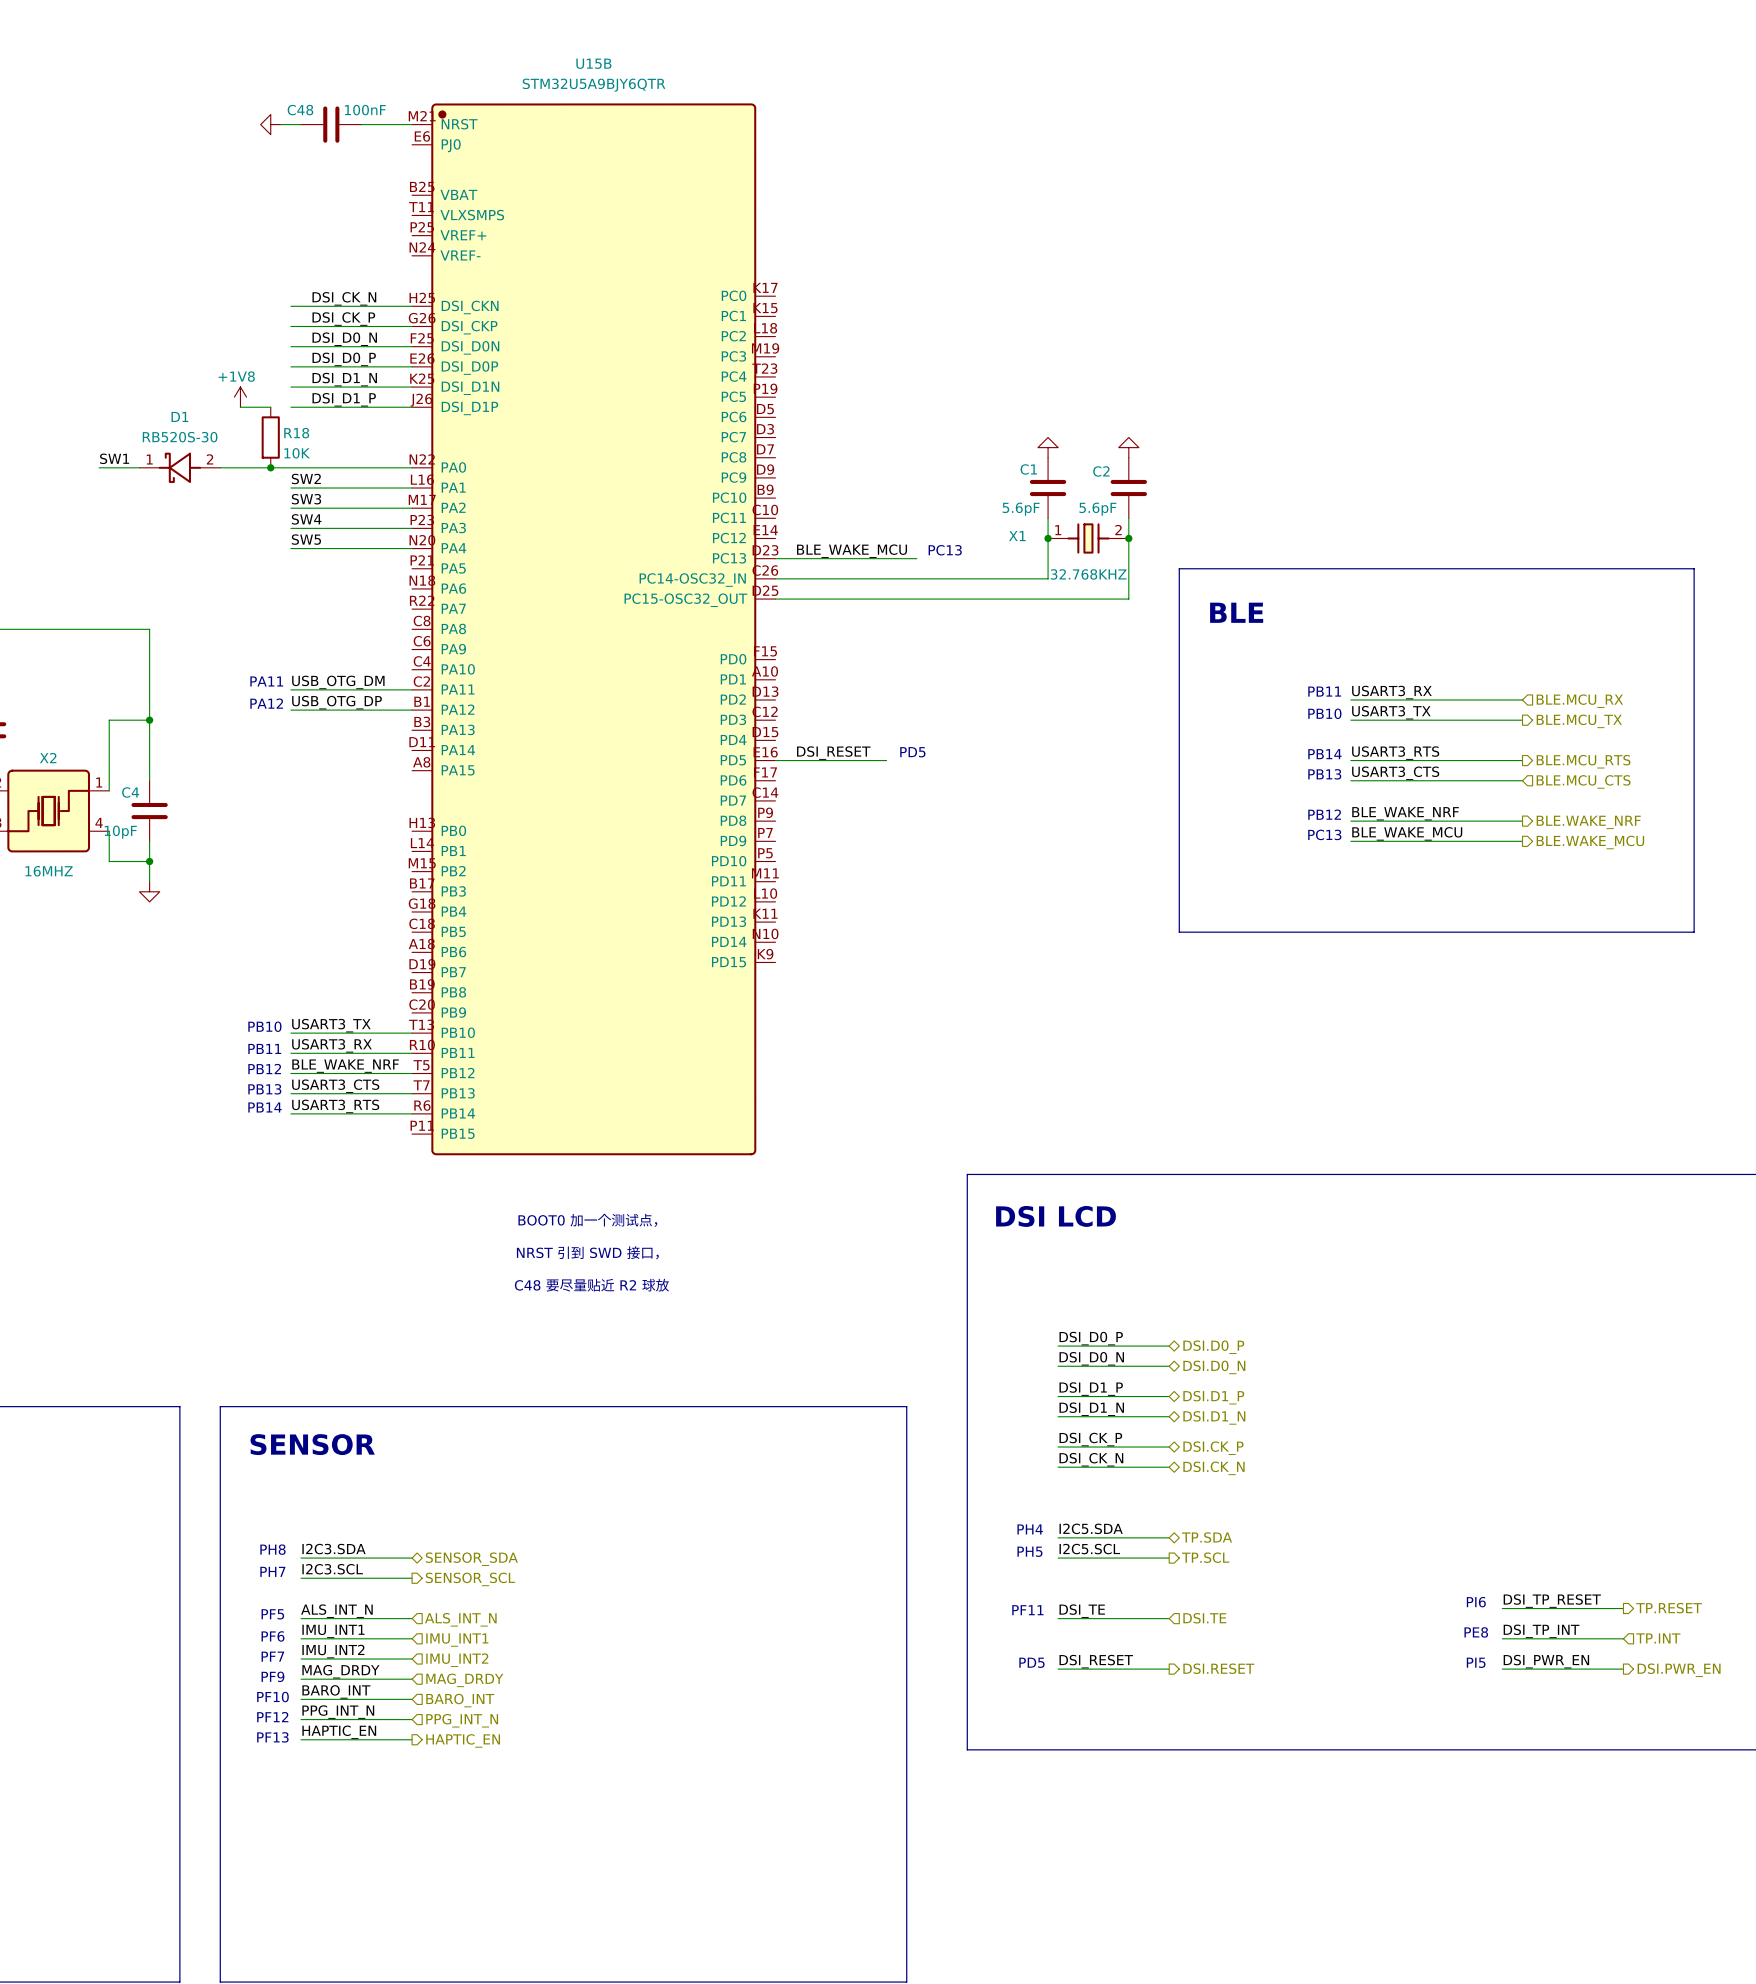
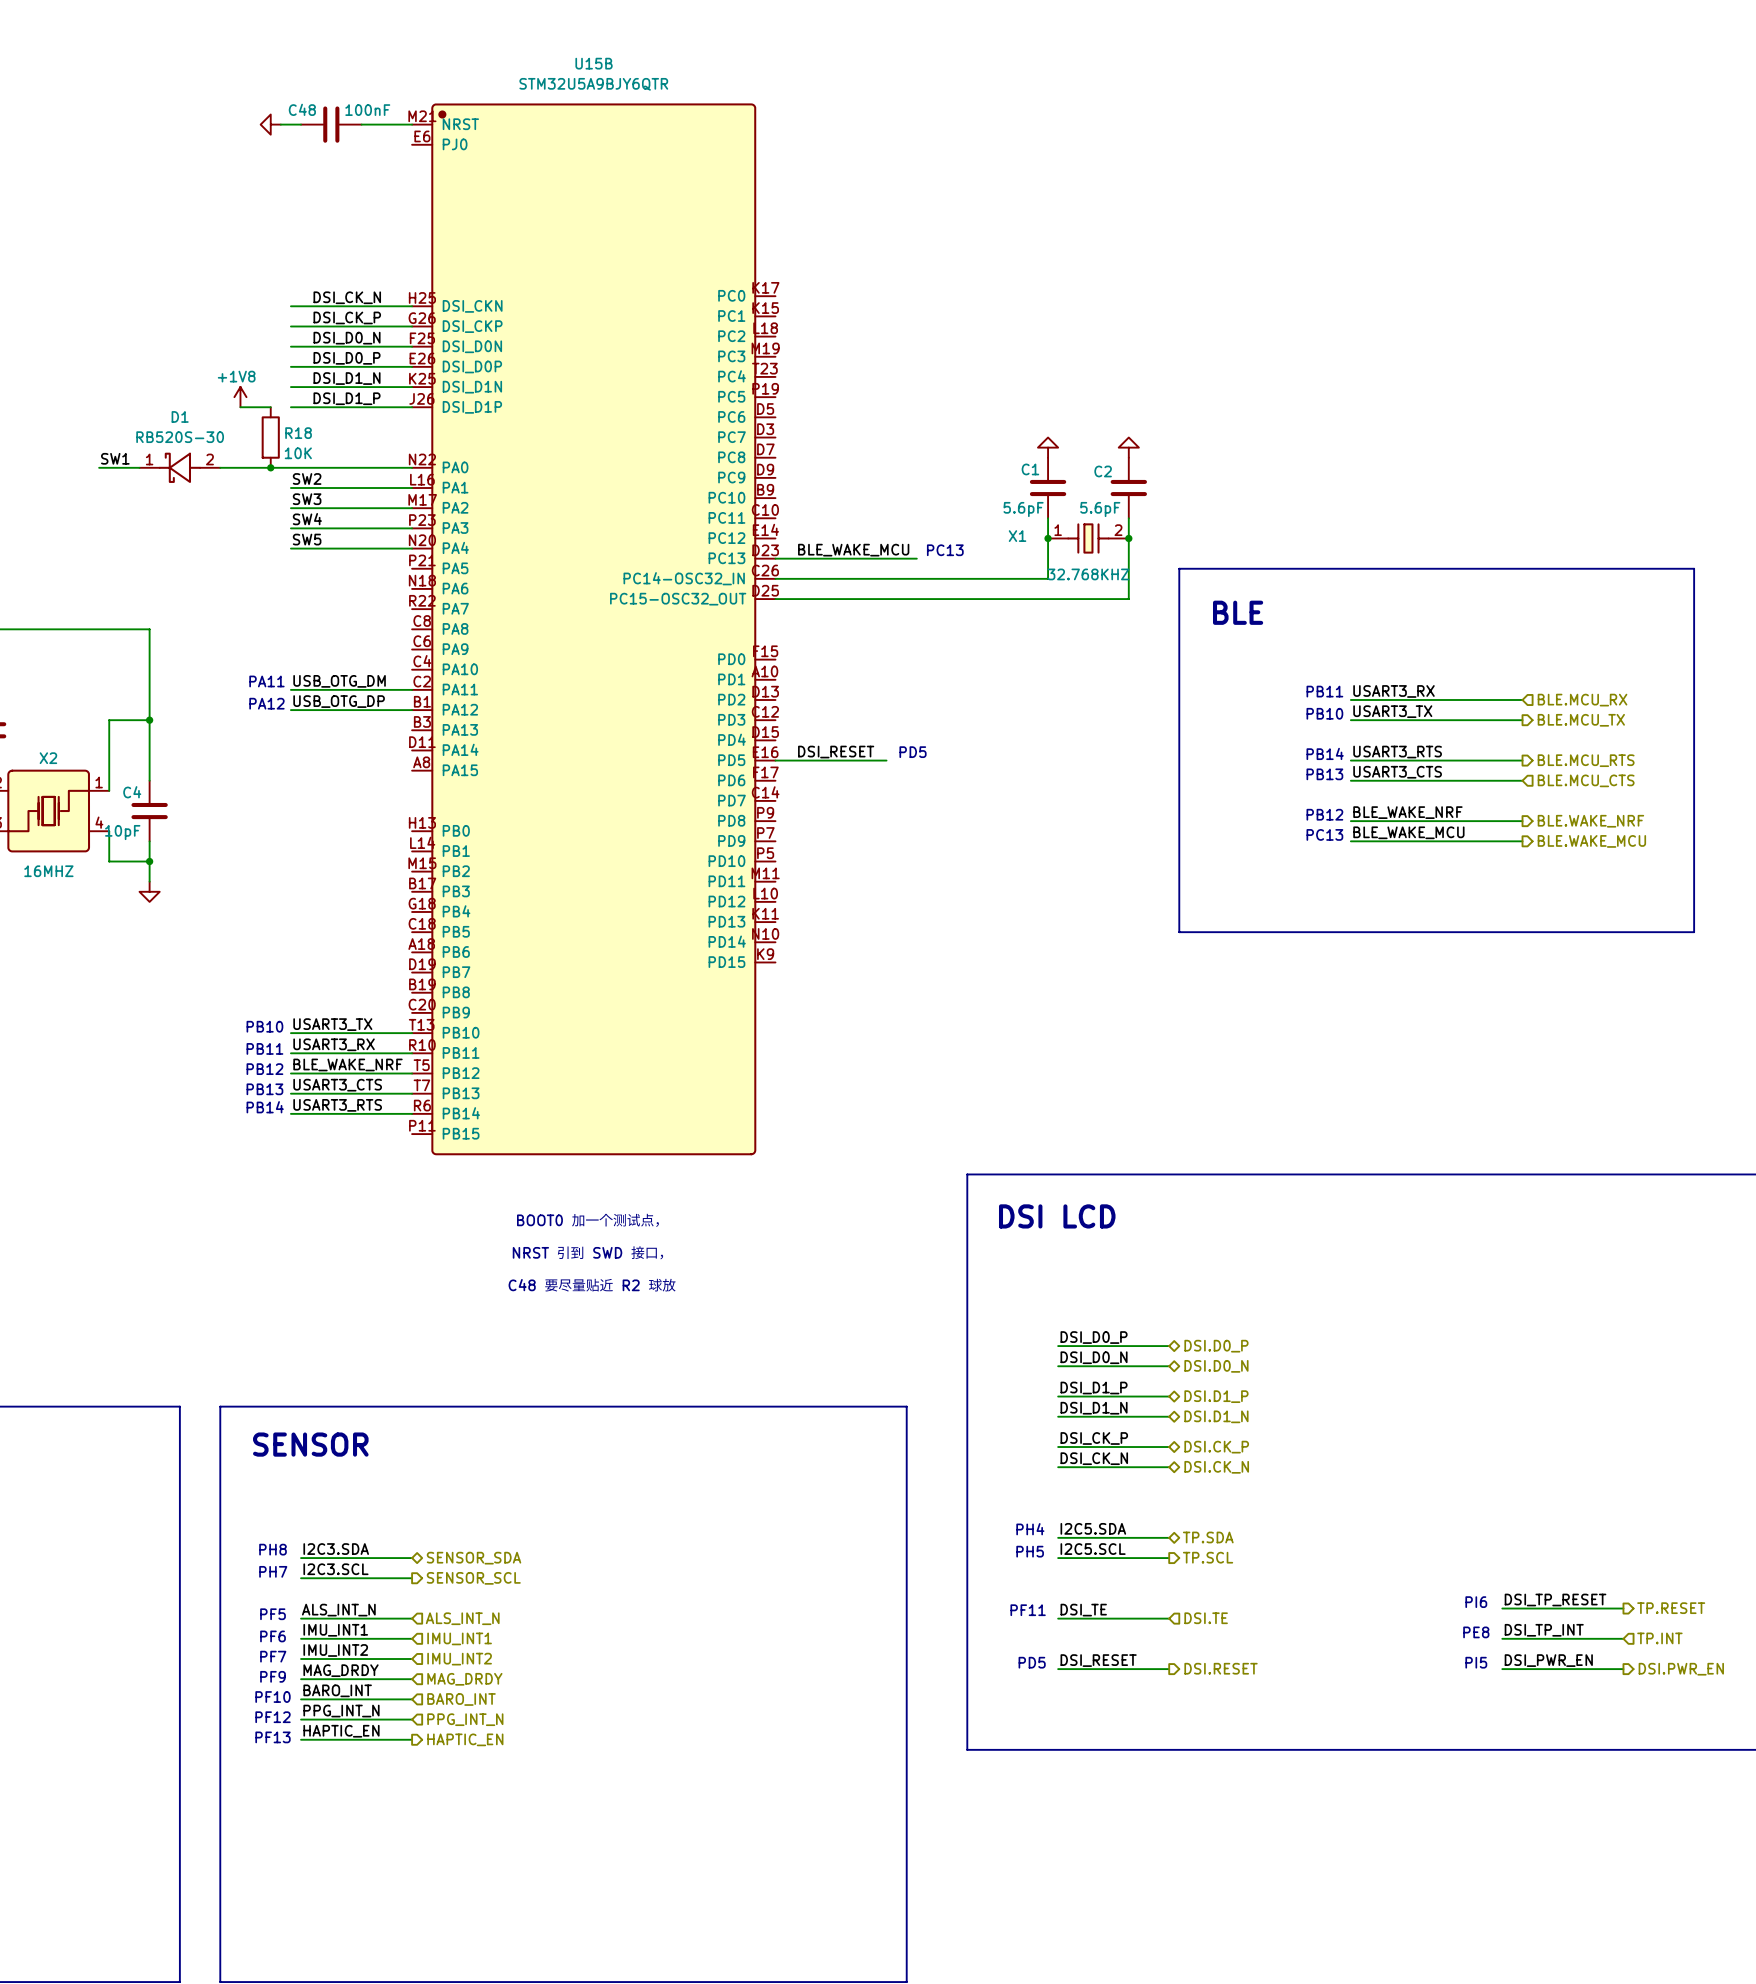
U15B symbol: [412, 103, 776, 1156] -> [412, 103, 776, 1156]

